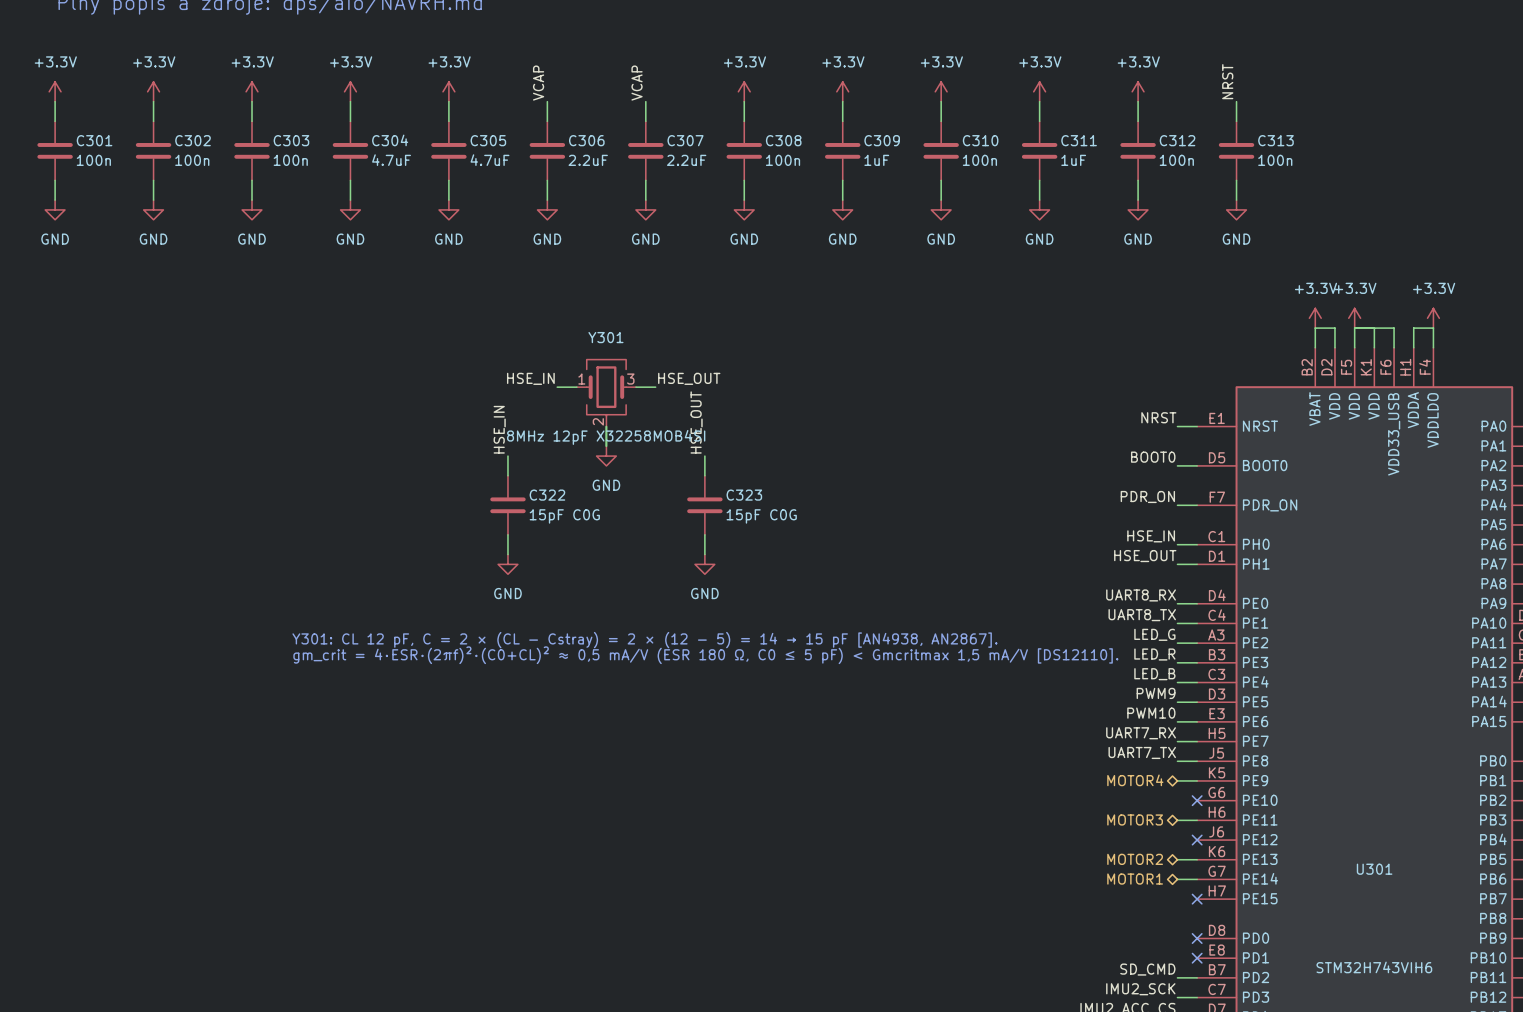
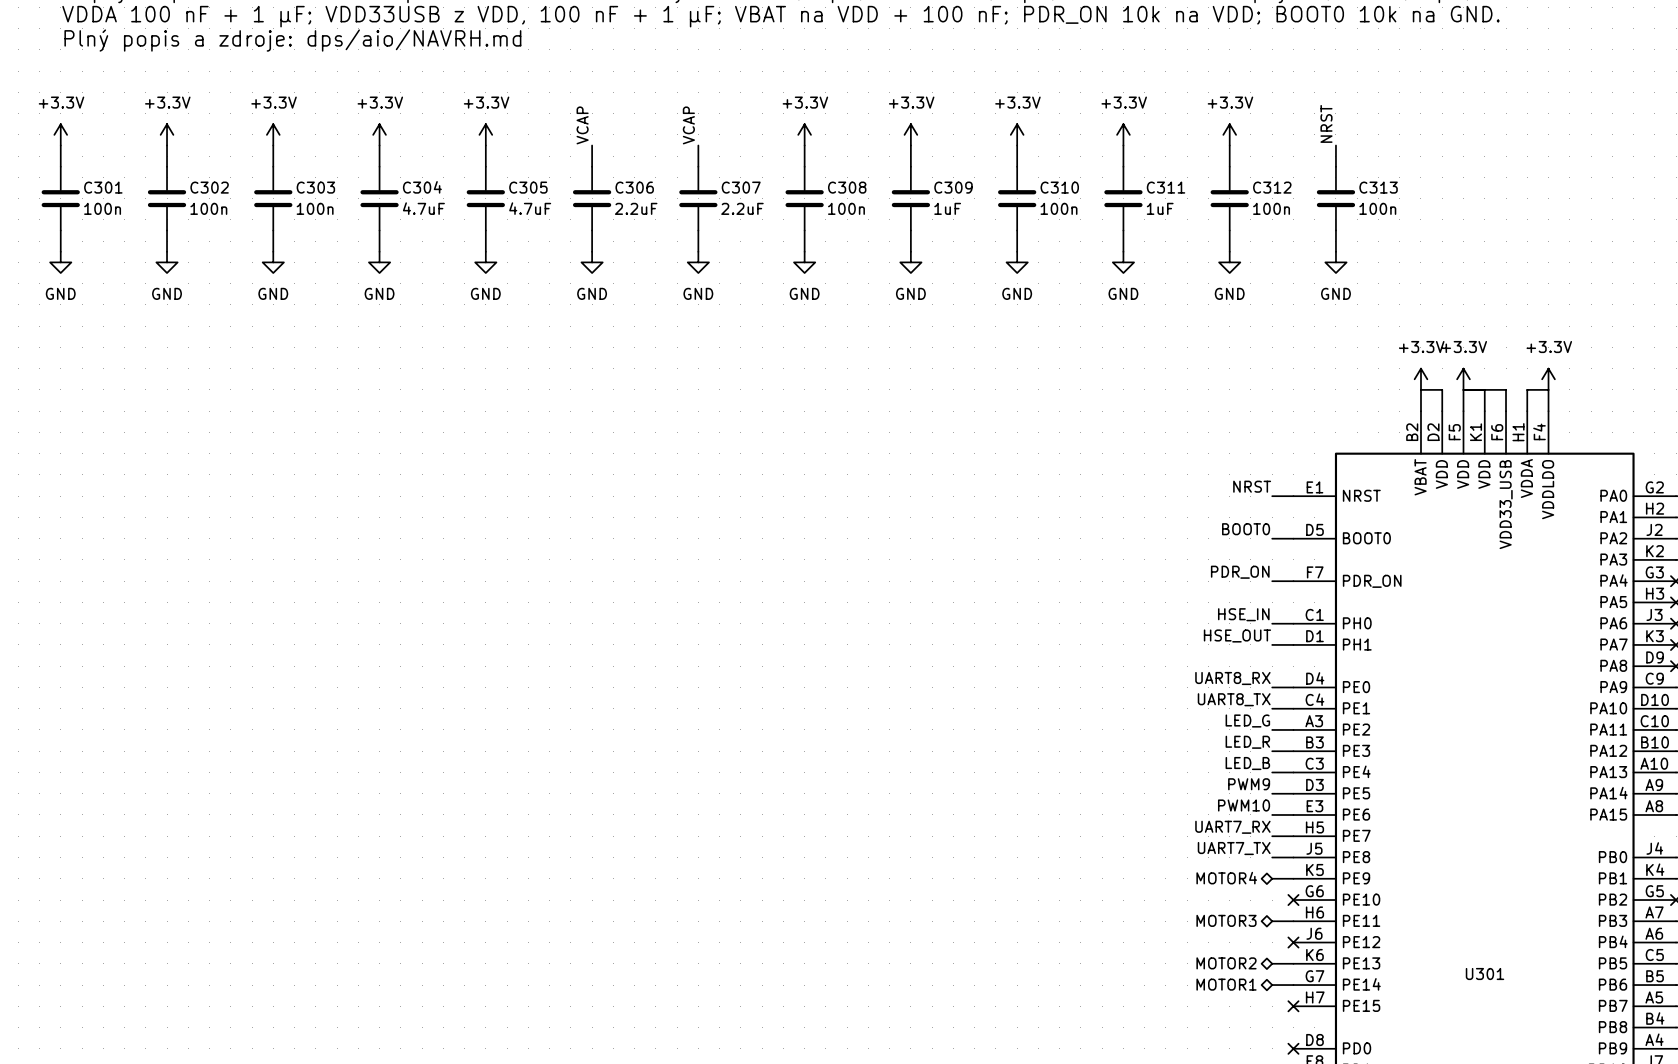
label: HSE_IN (530, 378) -> none
label: HSE_OUT (689, 378) -> none
wire: (557, 387) (576, 387) -> none
wire: (635, 387) (655, 387) -> none
Y301: 8MHz 12pF X32258MOB4SI (606, 393) -> none
label: HSE_OUT (696, 422) -> none
wire: (606, 426) (606, 446) -> none
label: HSE_IN (499, 429) -> none
wire: (507, 456) (507, 475) -> none
power symbol: GND (606, 456) -> none
wire: (704, 456) (704, 475) -> none
C322: 15pF C0G (507, 505) -> none
C323: 15pF C0G (704, 505) -> none
wire: (507, 534) (507, 554) -> none
wire: (704, 534) (704, 554) -> none
power symbol: GND (507, 564) -> none
power symbol: GND (704, 564) -> none
text: Y301: CL 12 pF, C = 2 × (CL − Cstray) = 2 × (12 − 5) = 14 → 15 pF [AN4938, AN2867]. (644, 640) -> none
text: gm_crit = 4·ESR·(2πf)²·(C0+CL)² ≈ 0,5 mA/V (ESR 180 Ω, C0 ≤ 5 pF) < Gmcritmax 1,5 mA/V [DS12110]. (705, 655) -> none

